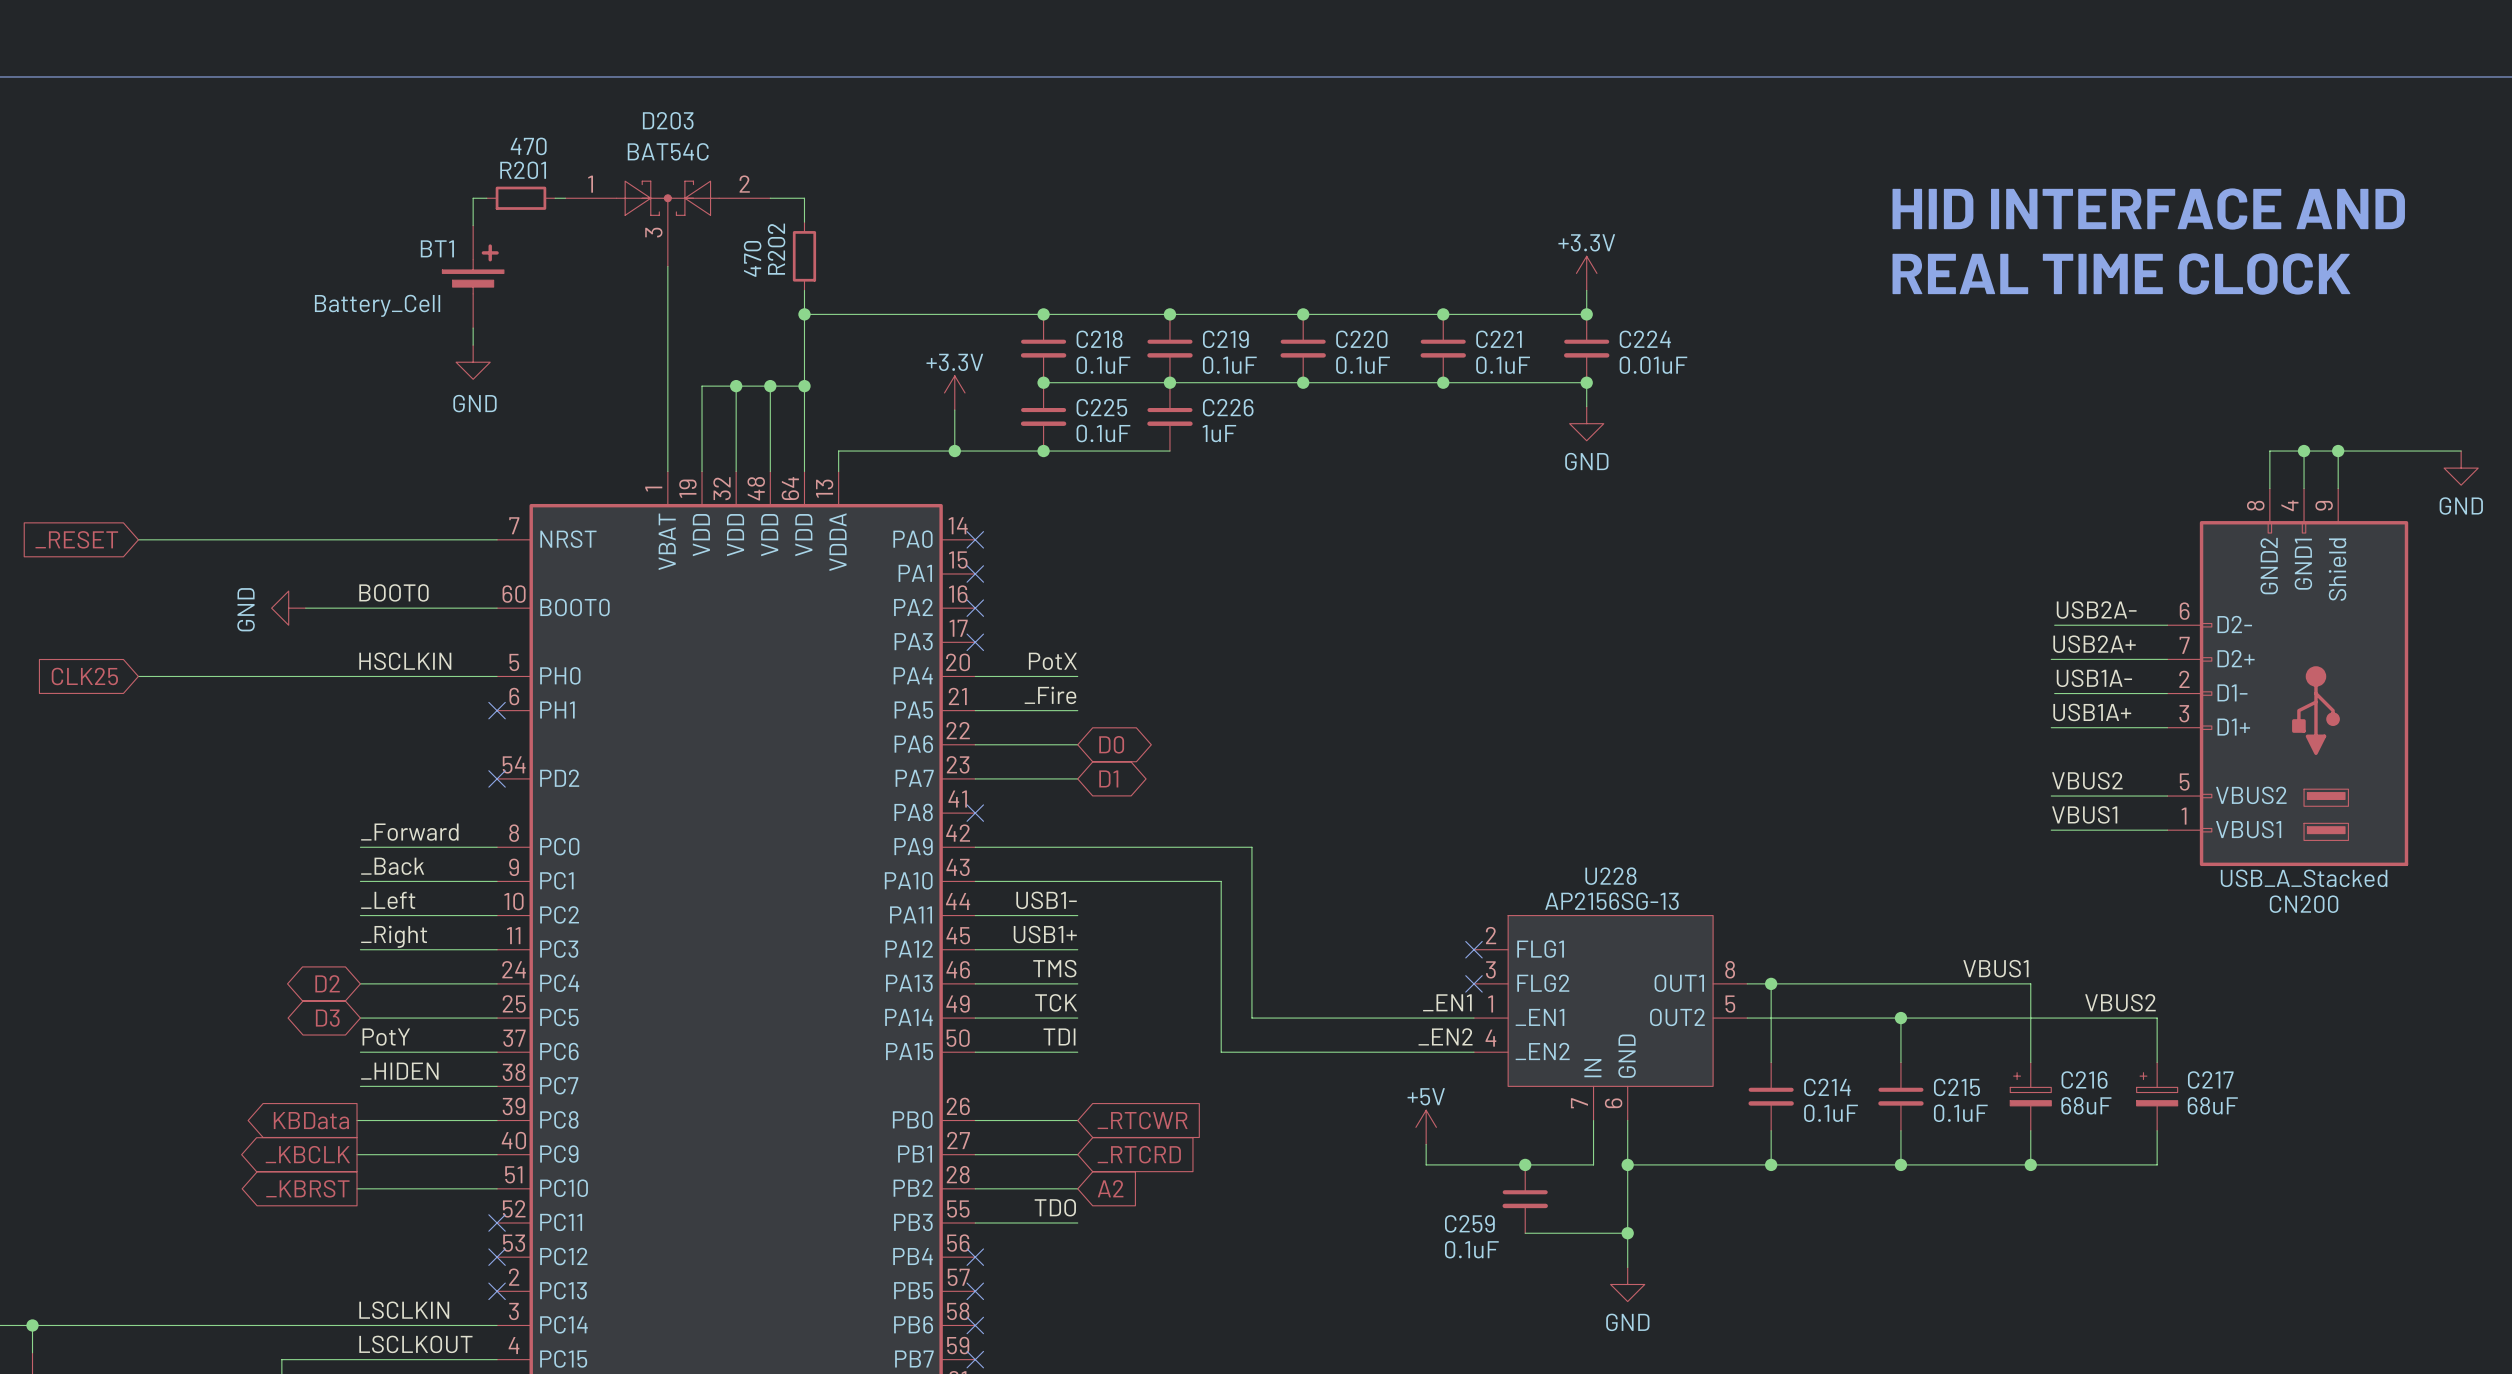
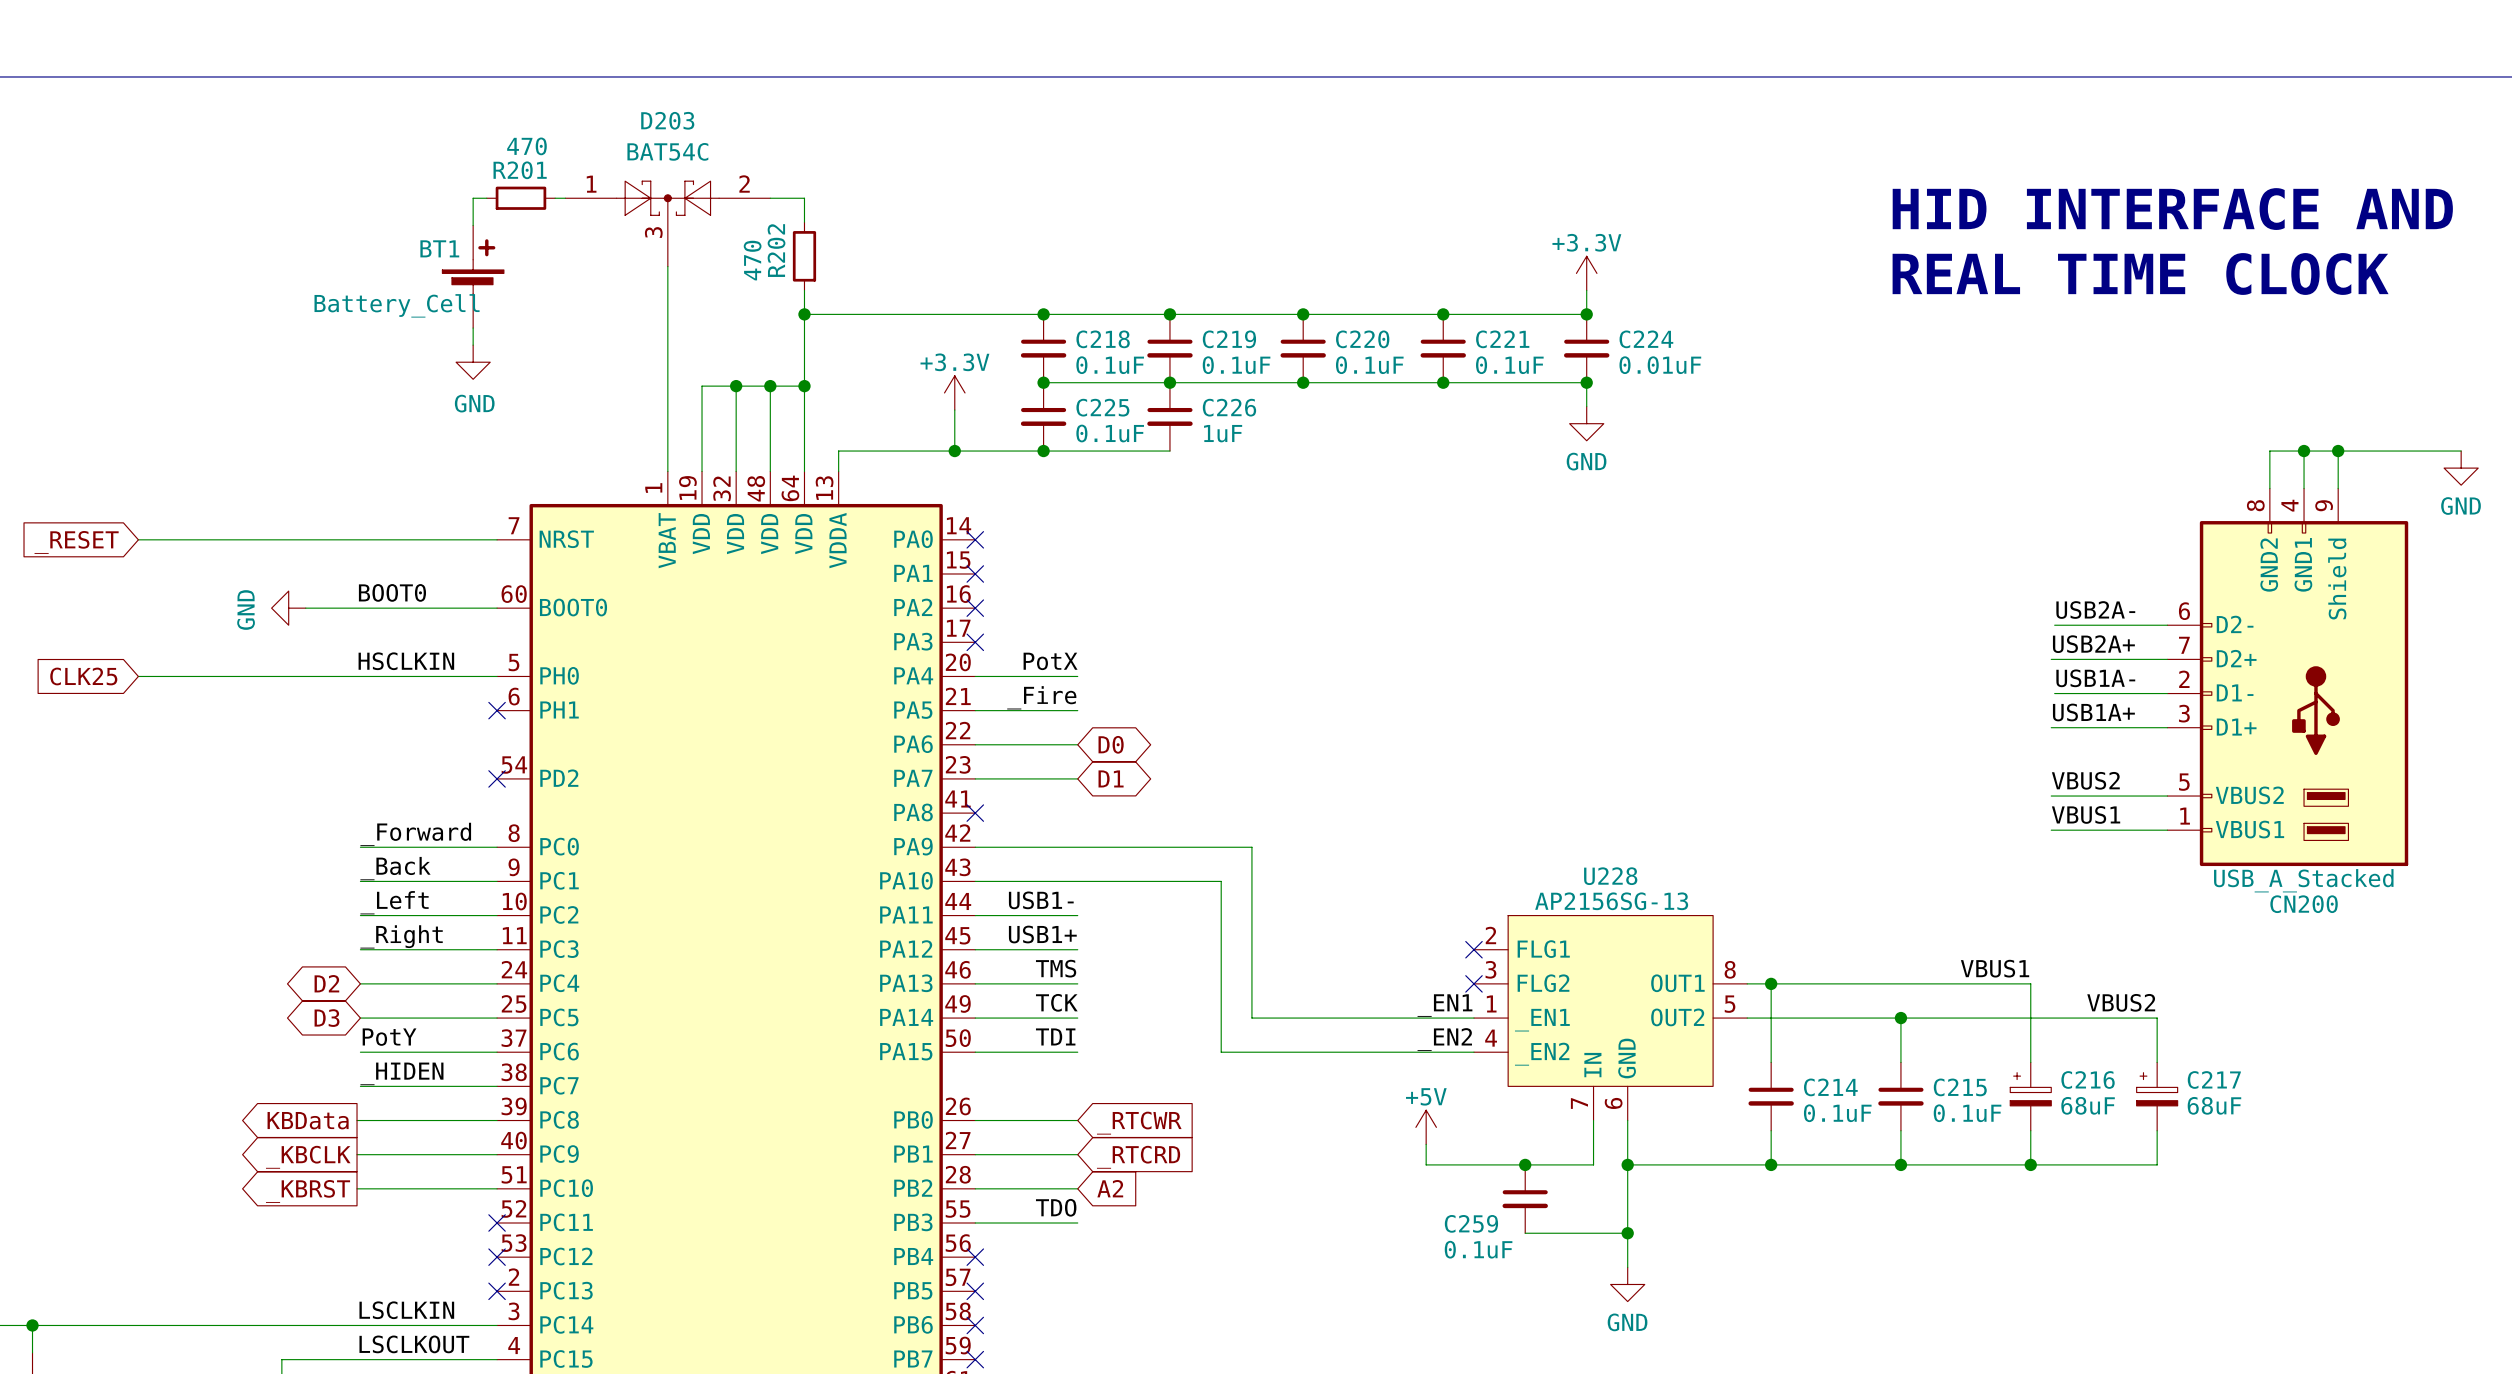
BT1 symbol: [442, 225, 504, 329] -> [442, 225, 504, 329]

